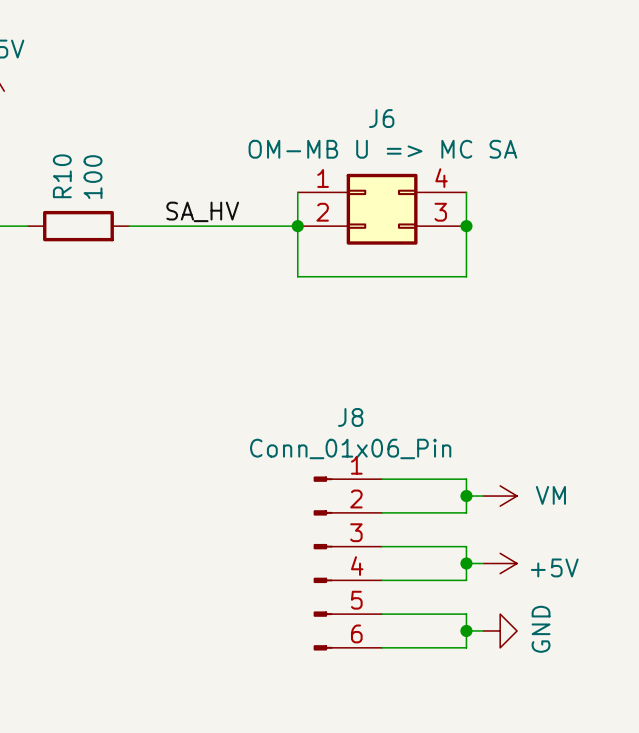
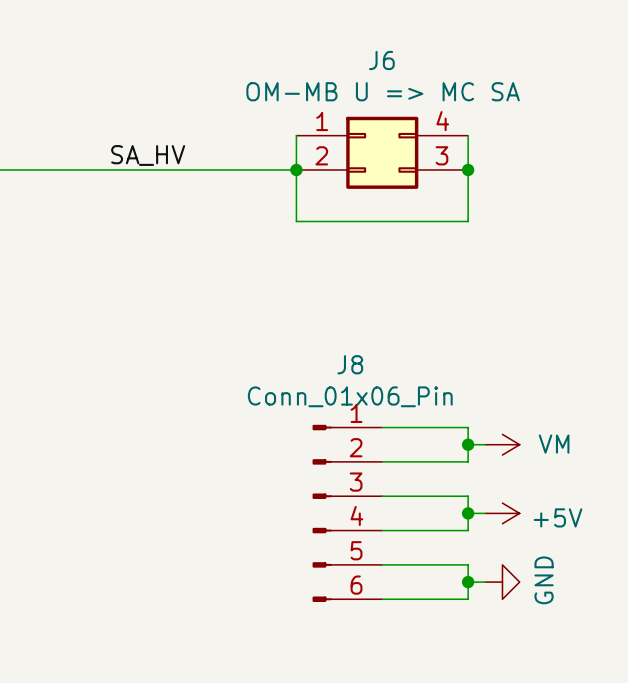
label position: SA_HV (202, 211) -> SA_HV (148, 155)
wire: none -> (21, 169) (124, 169)
R10: 100 (78, 226) -> none

